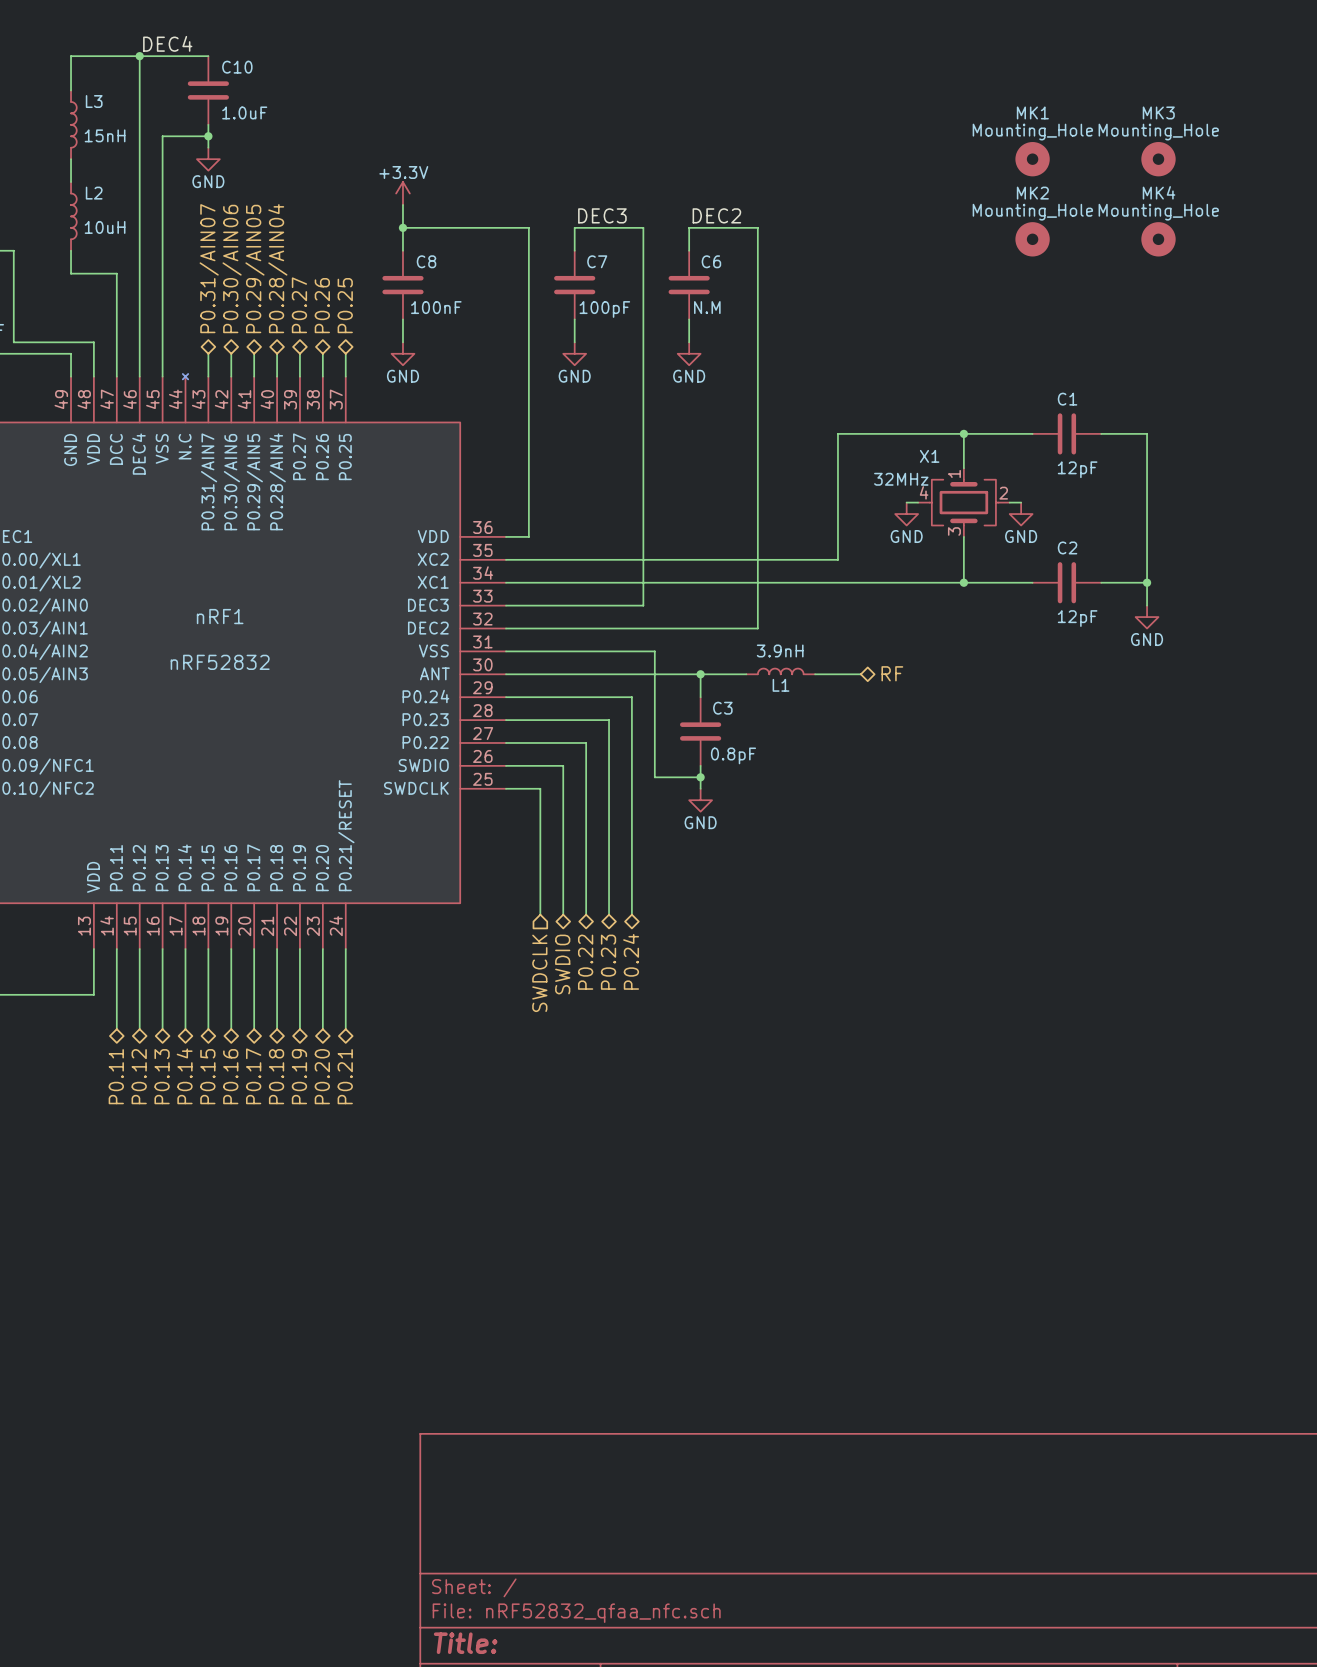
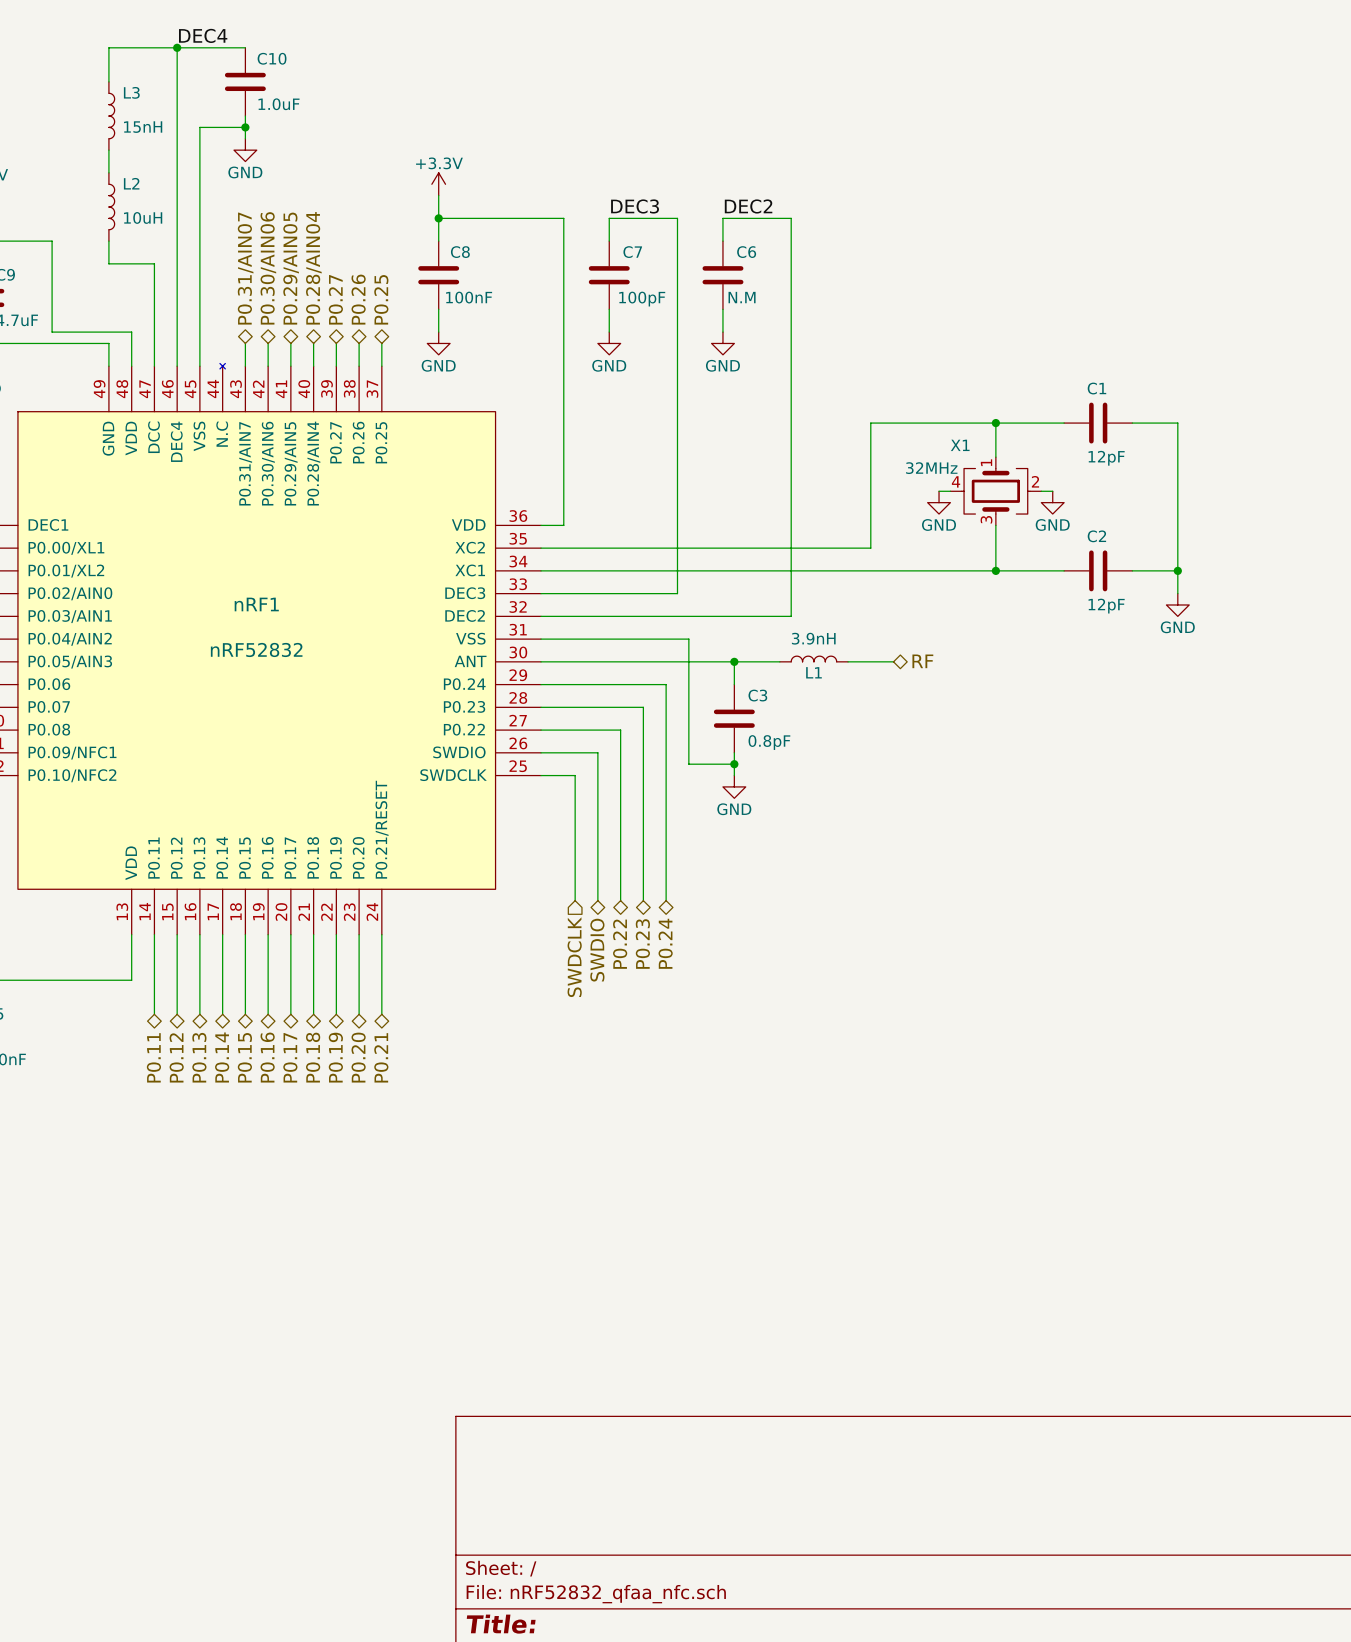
MK1: Mounting_Hole (1032, 159) -> none
MK3: Mounting_Hole (1158, 159) -> none
MK2: Mounting_Hole (1032, 239) -> none
MK4: Mounting_Hole (1158, 239) -> none

